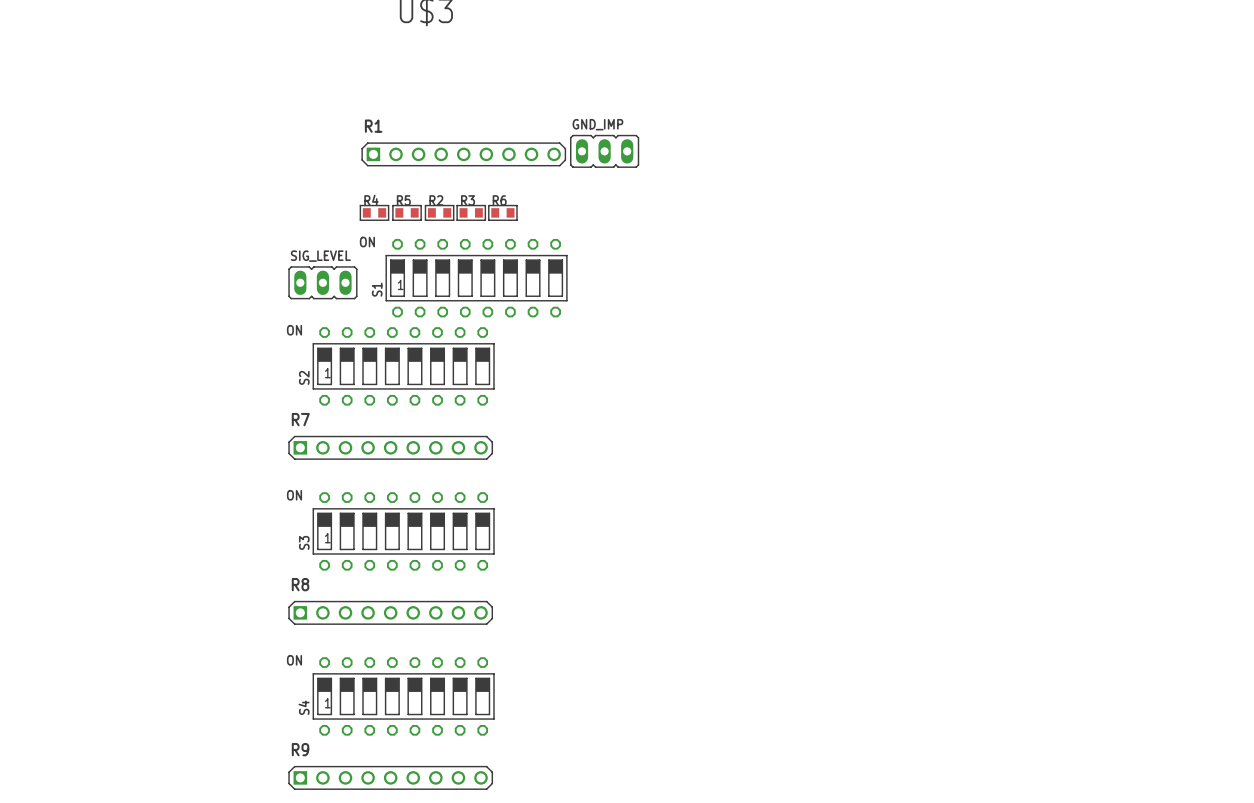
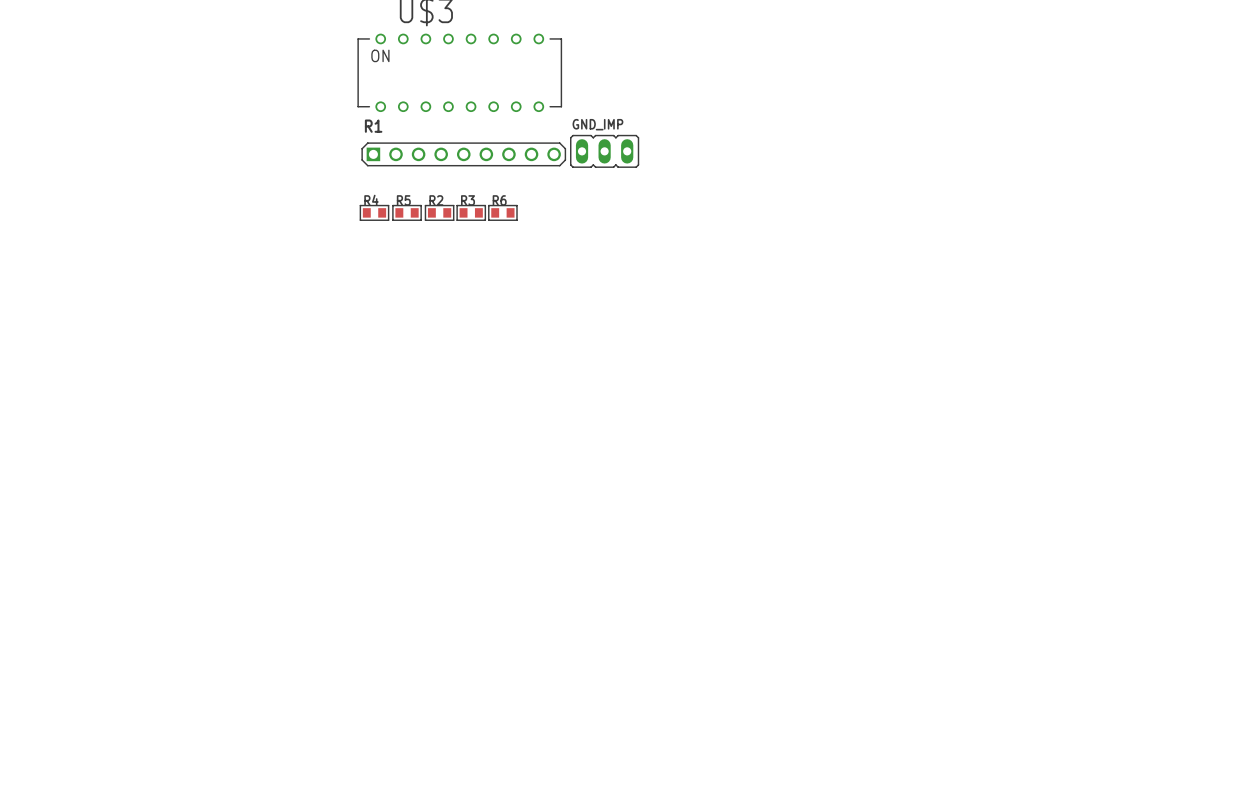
part: none -> (459, 72)
S1: (476, 278) -> none
SIG_LEVEL: (322, 282) -> none
S2: (403, 366) -> none
R7: (390, 447) -> none
S3: (403, 531) -> none
R8: (390, 612) -> none
S4: (403, 696) -> none
R9: (390, 777) -> none

